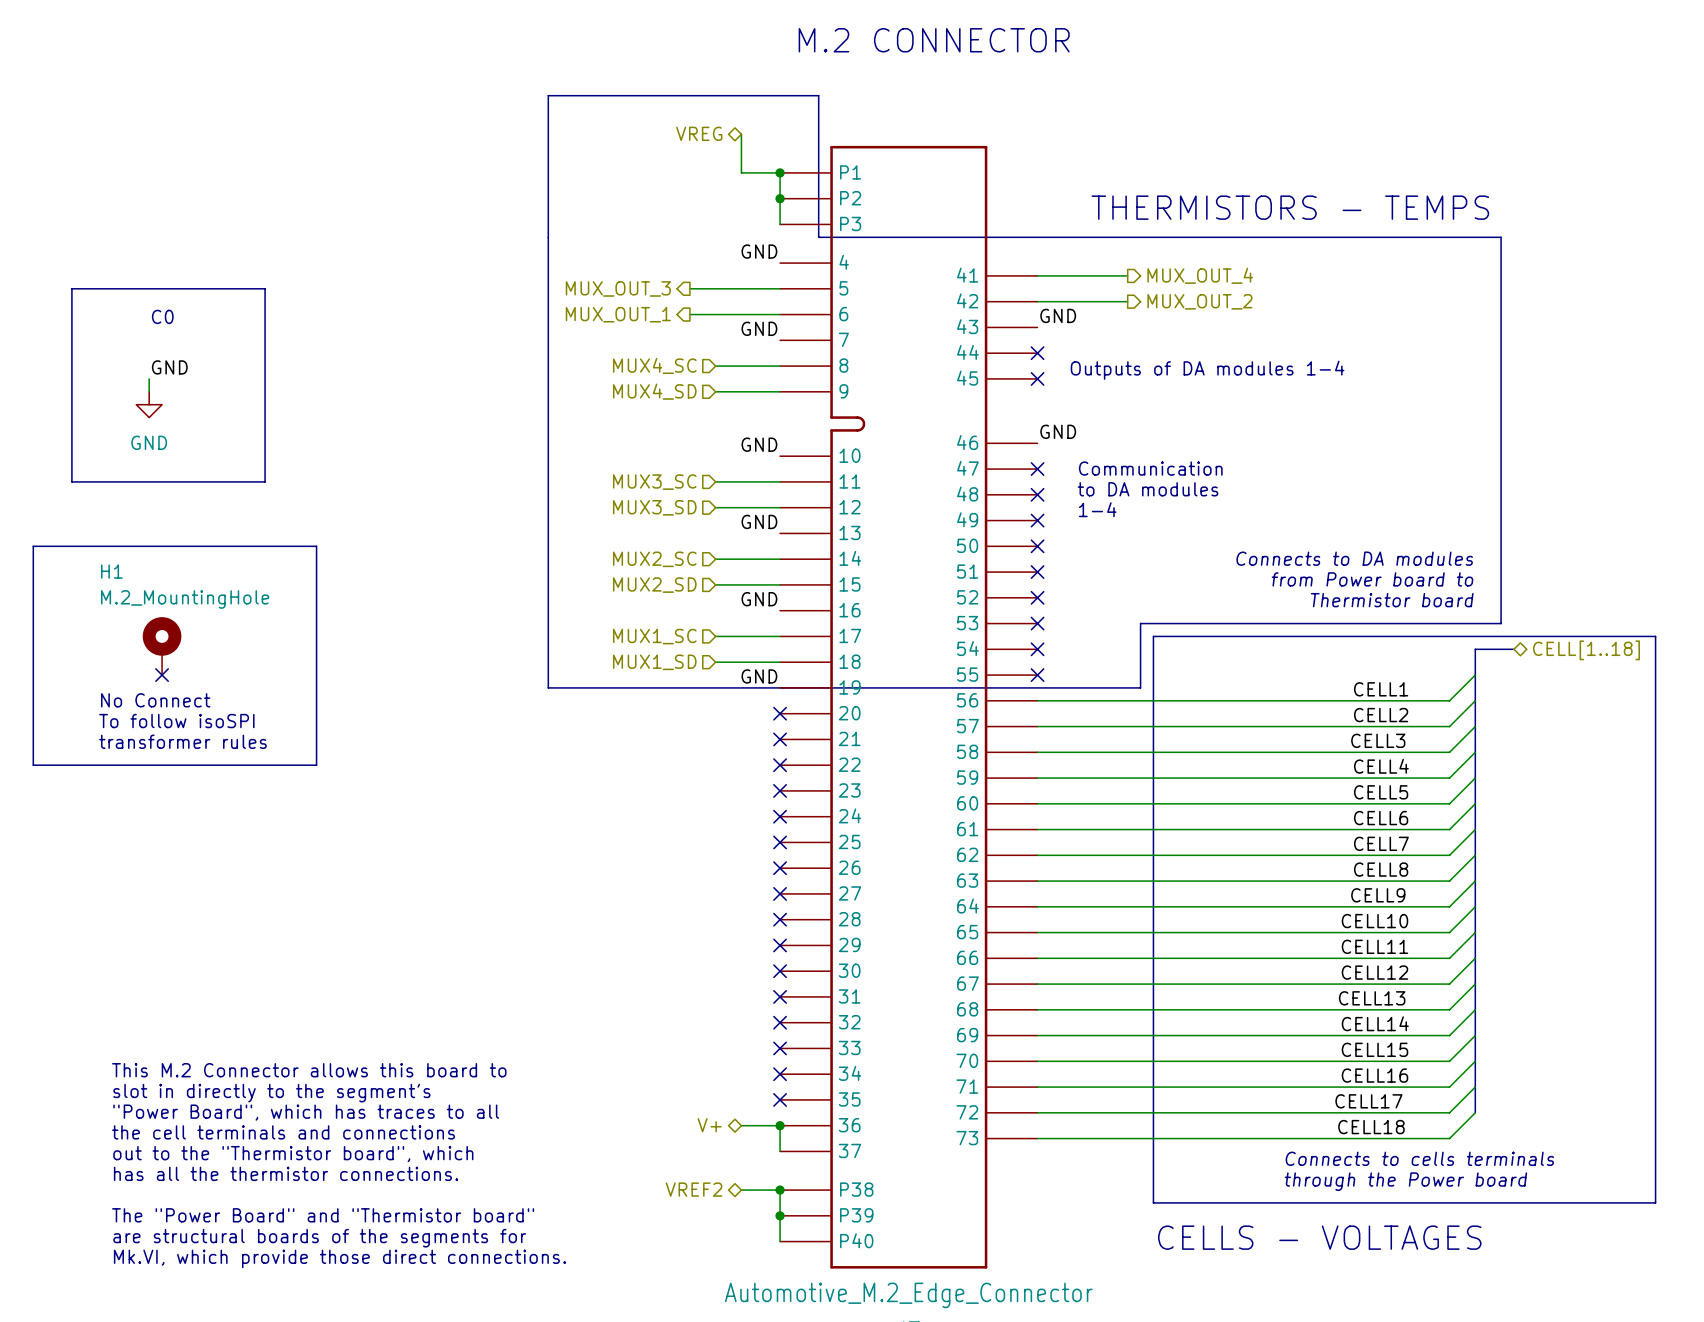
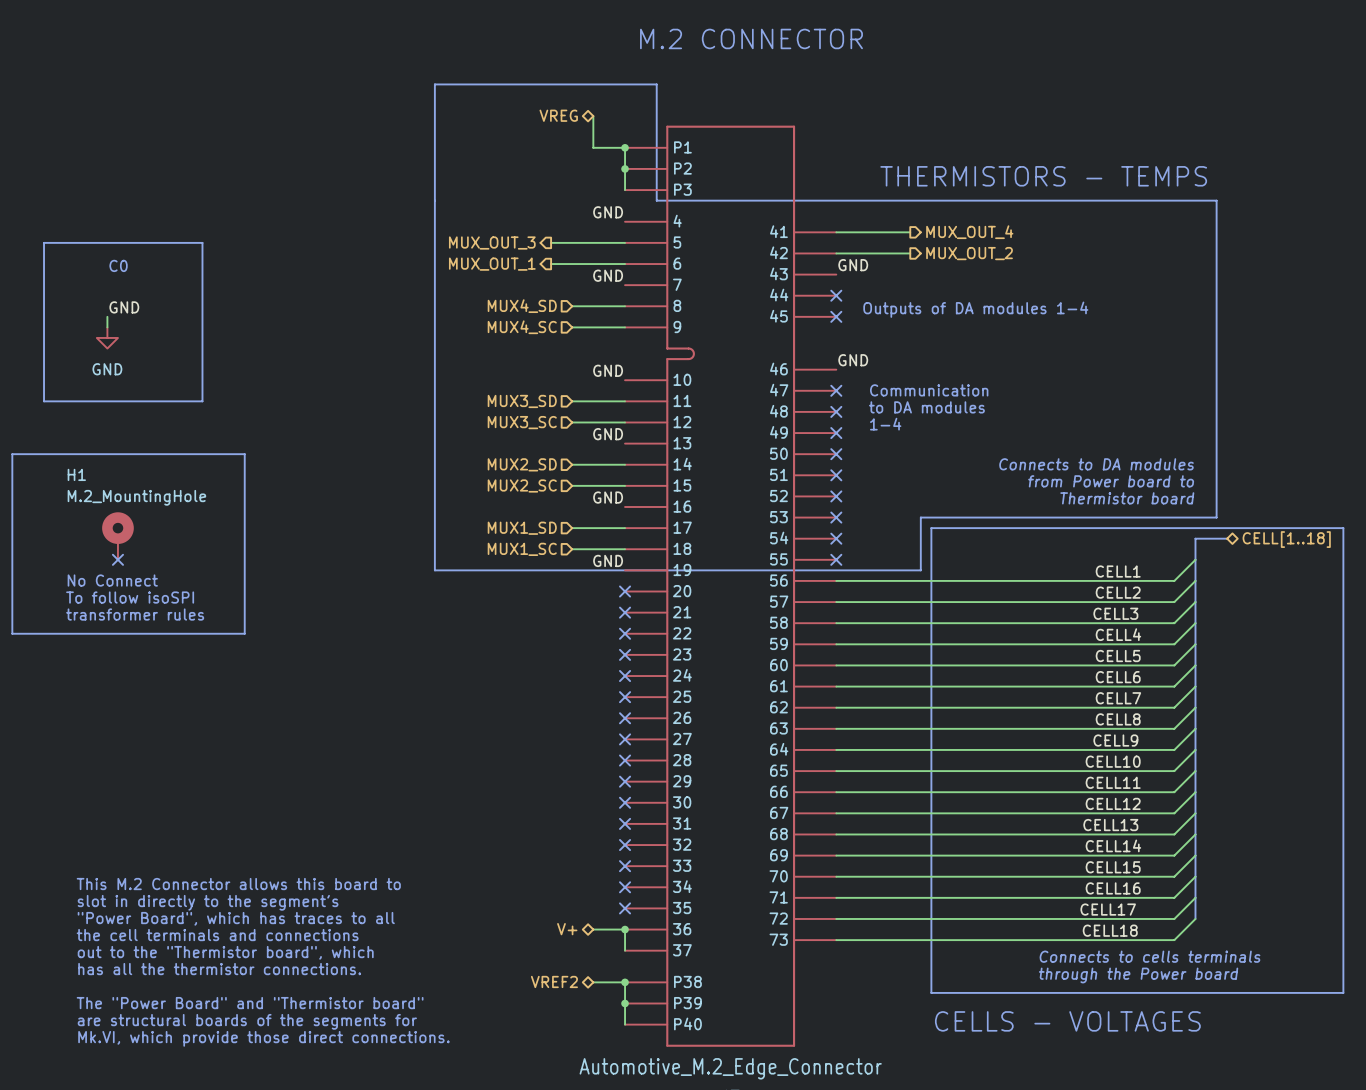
hierarchical label: MUX4_SC (654, 365) -> MUX4_SD (522, 306)
hierarchical label: MUX4_SD (654, 391) -> MUX4_SC (522, 327)
hierarchical label: MUX3_SC (654, 482) -> MUX3_SD (522, 401)
hierarchical label: MUX3_SD (654, 507) -> MUX3_SC (522, 422)
hierarchical label: MUX2_SC (654, 559) -> MUX2_SD (522, 464)
hierarchical label: MUX2_SD (654, 585) -> MUX2_SC (522, 485)
hierarchical label: MUX1_SC (654, 636) -> MUX1_SD (522, 528)
hierarchical label: MUX1_SD (654, 662) -> MUX1_SC (522, 549)

